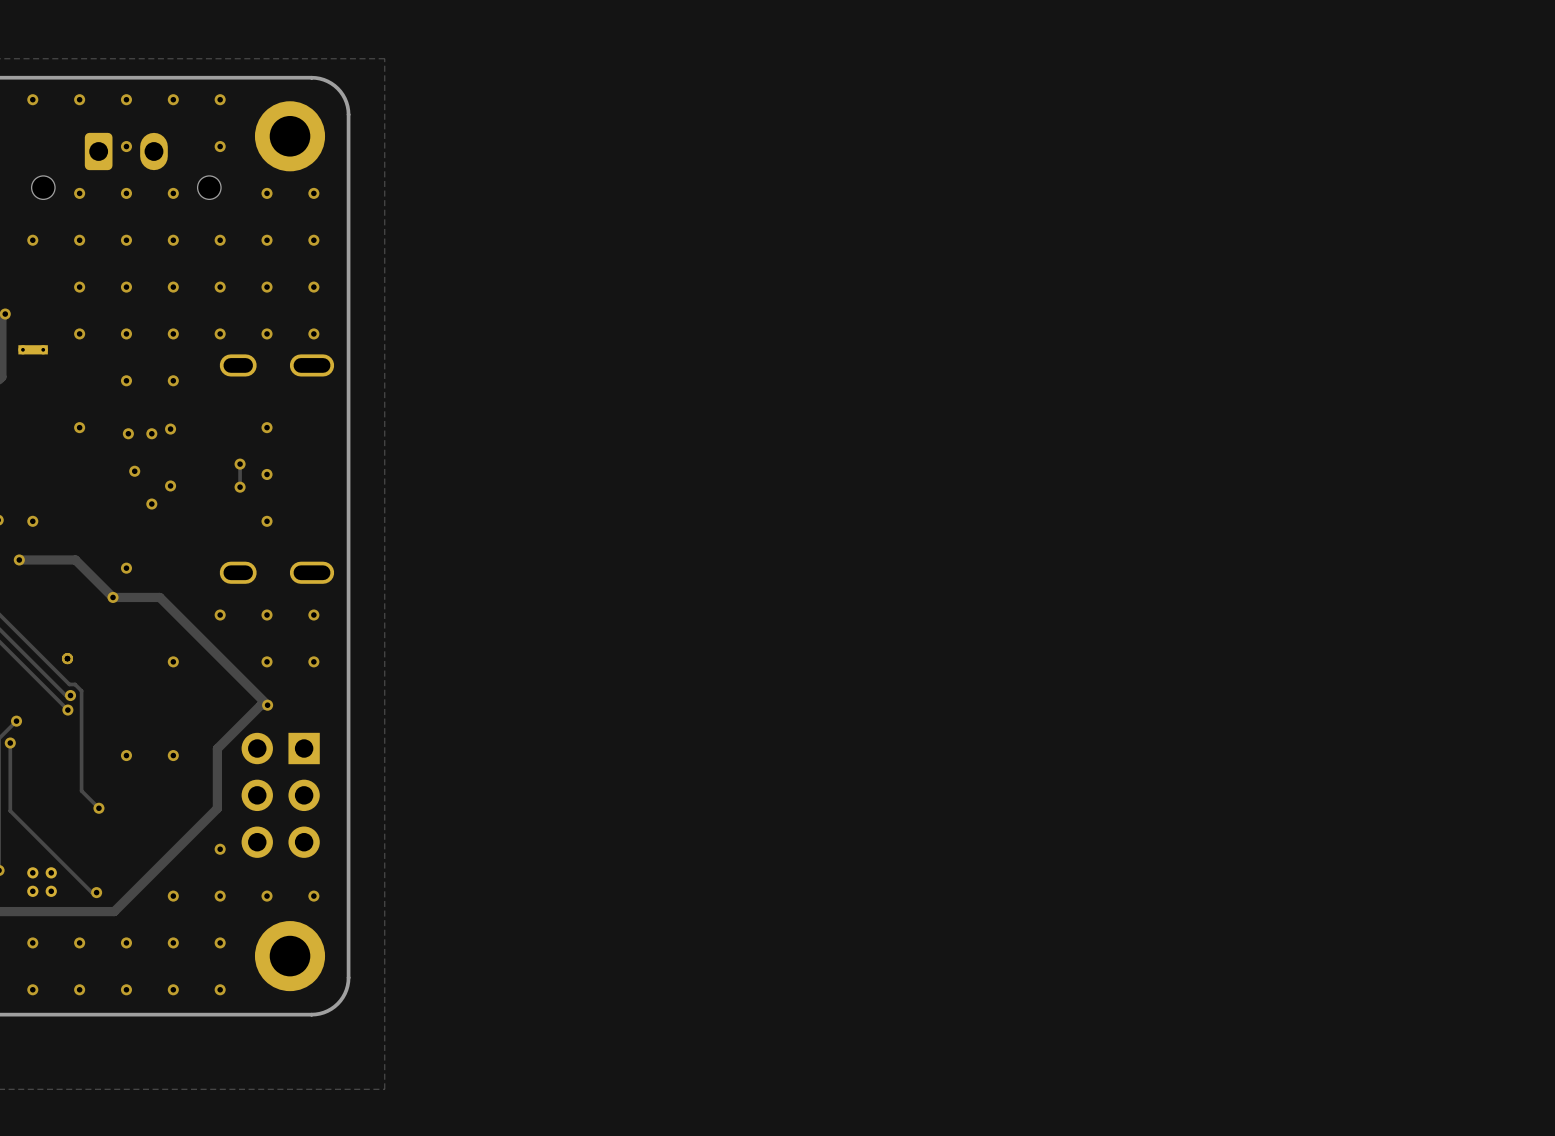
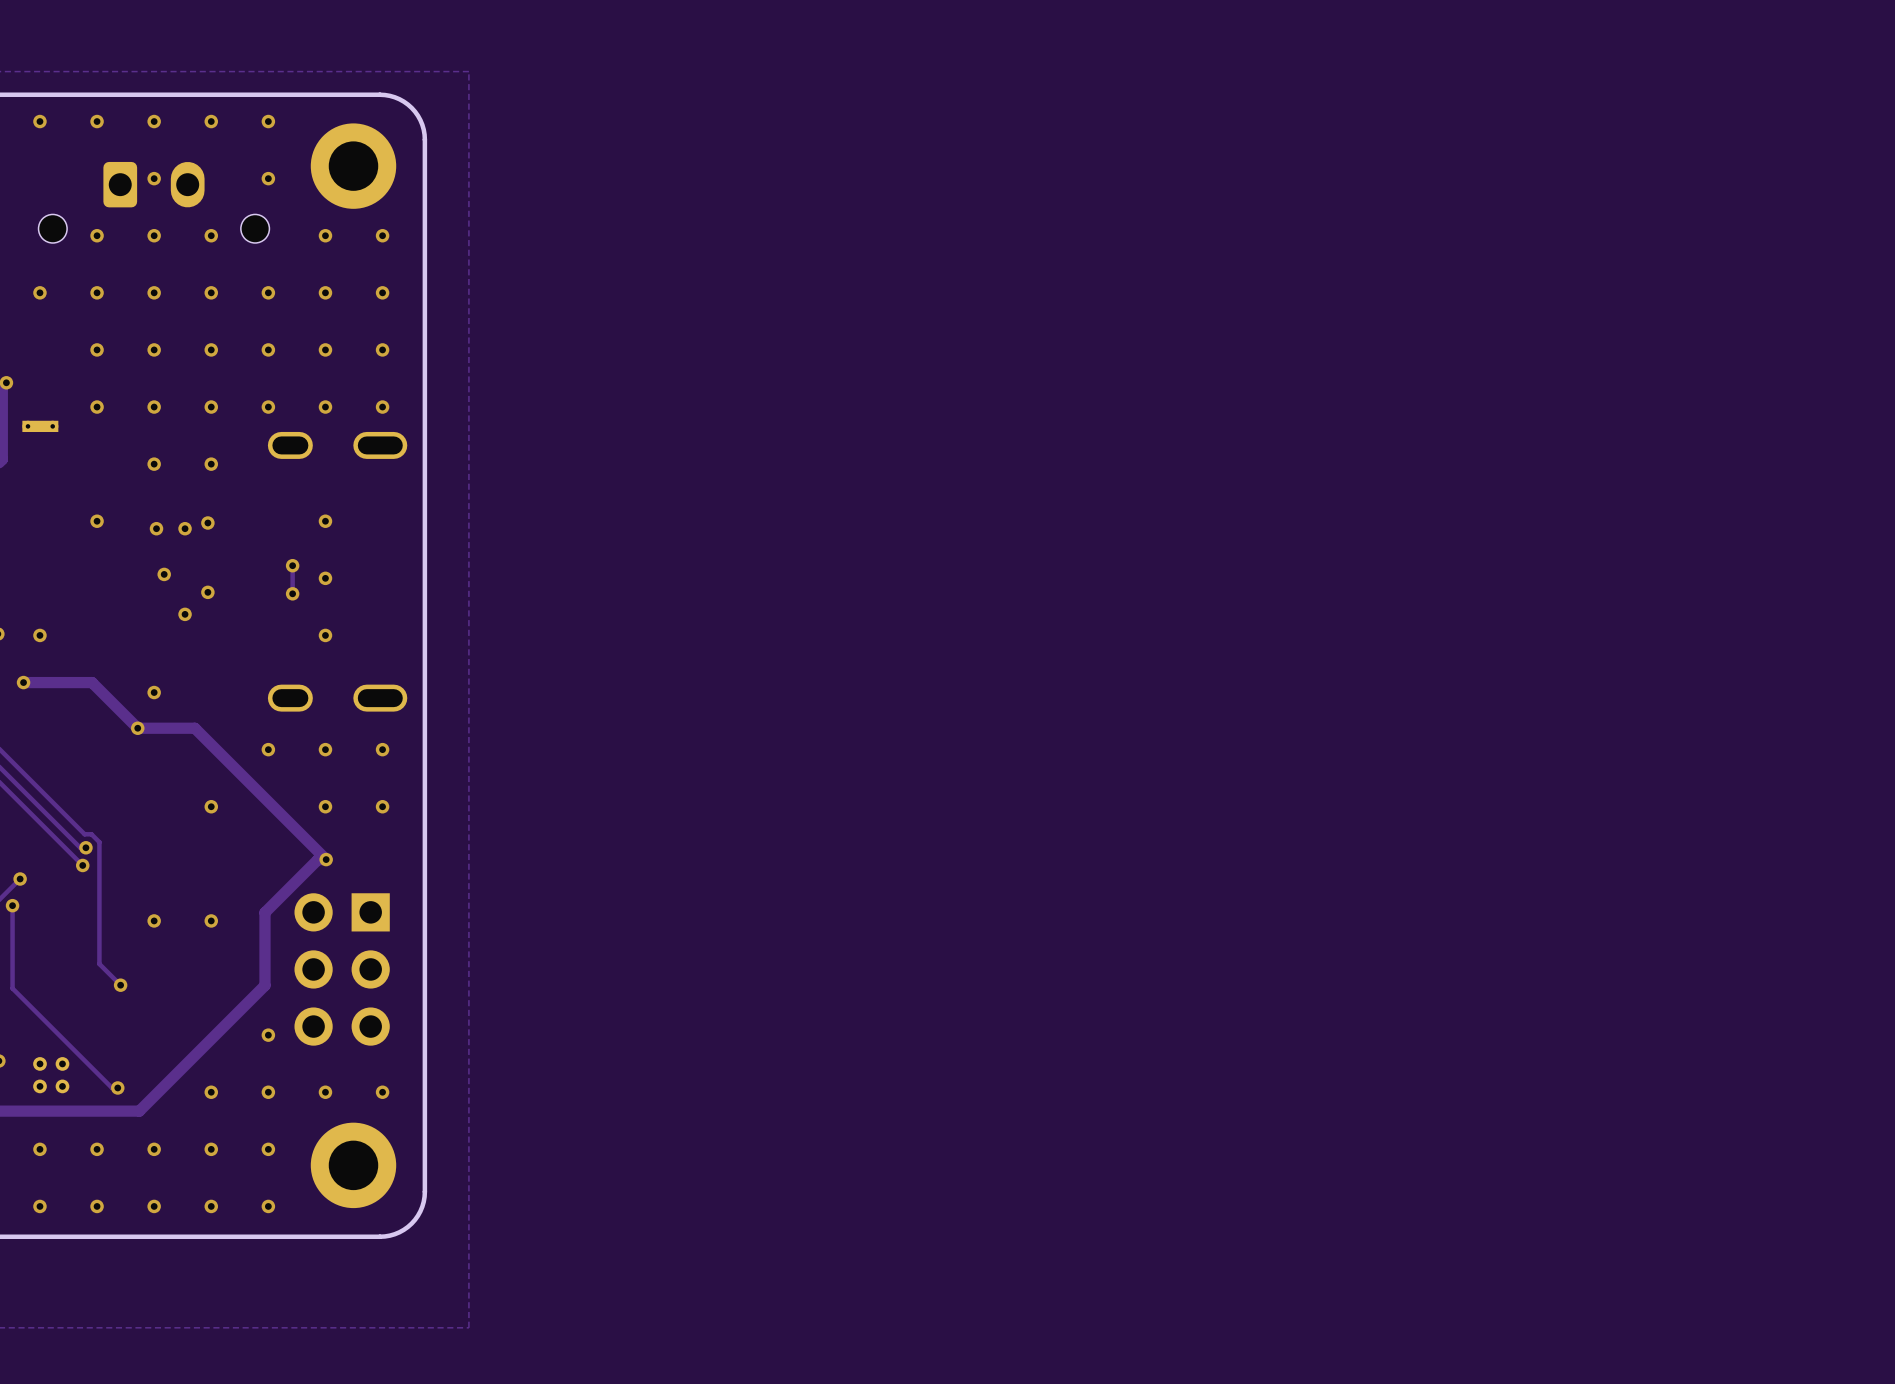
via: (67, 658) -> none

